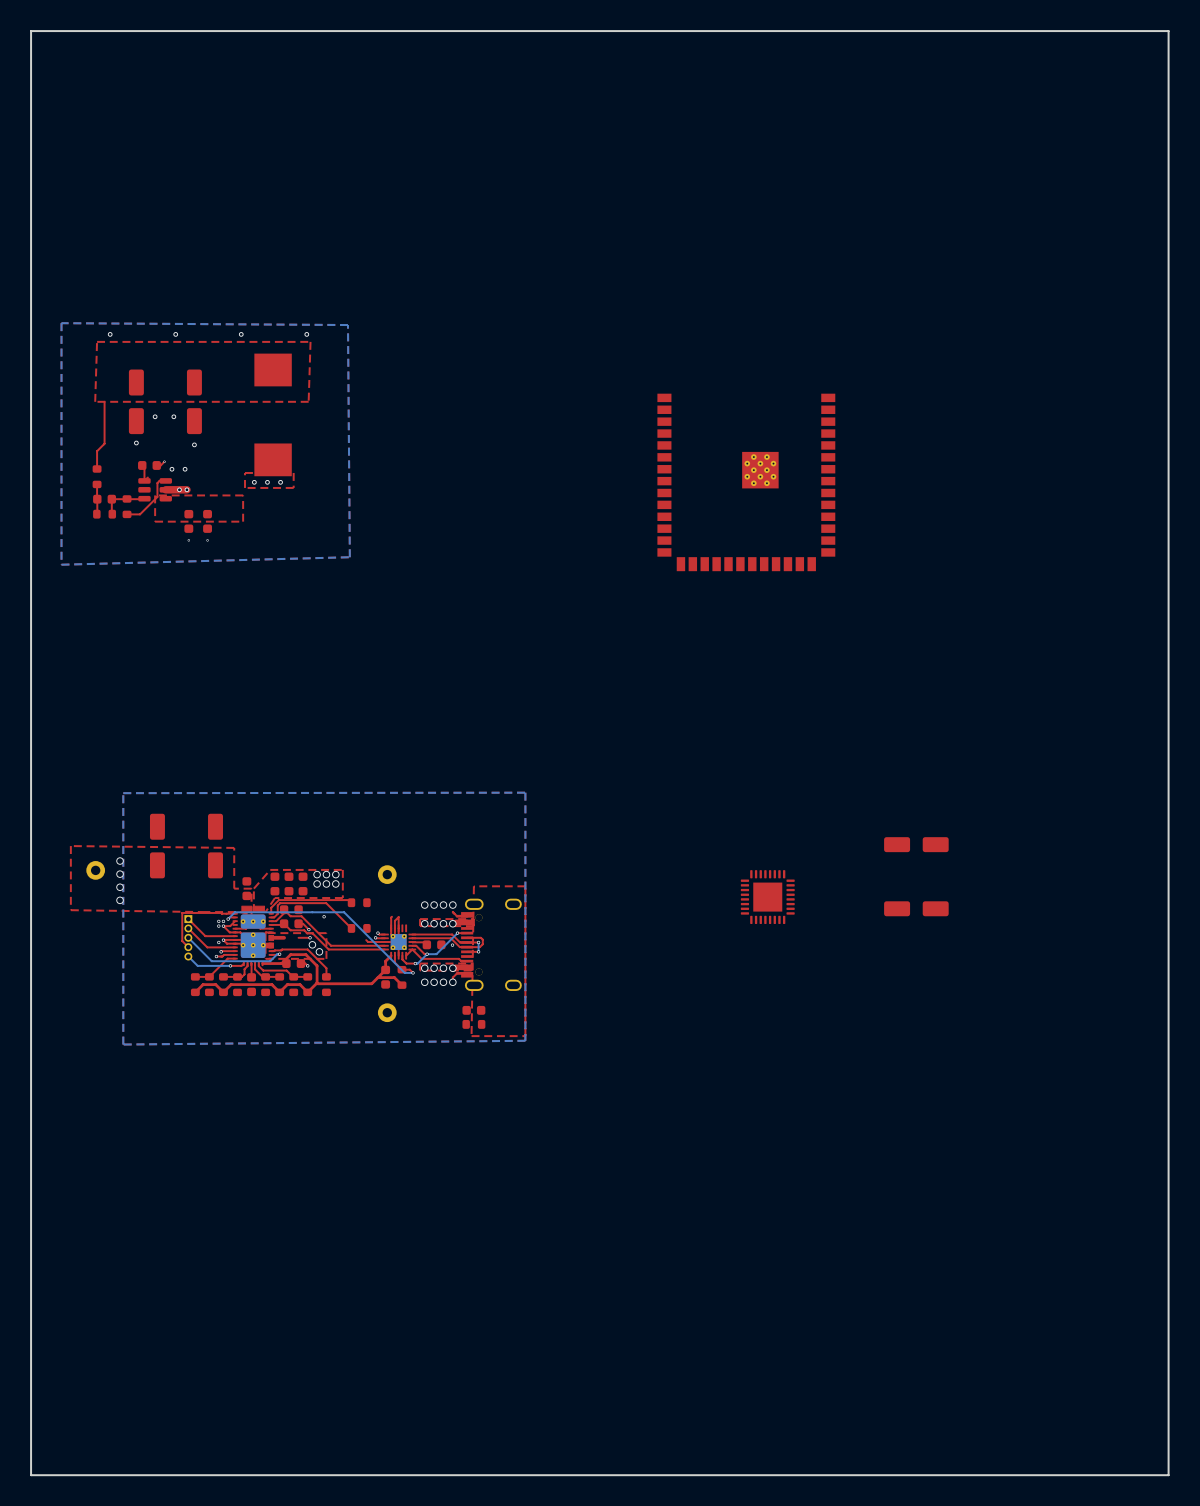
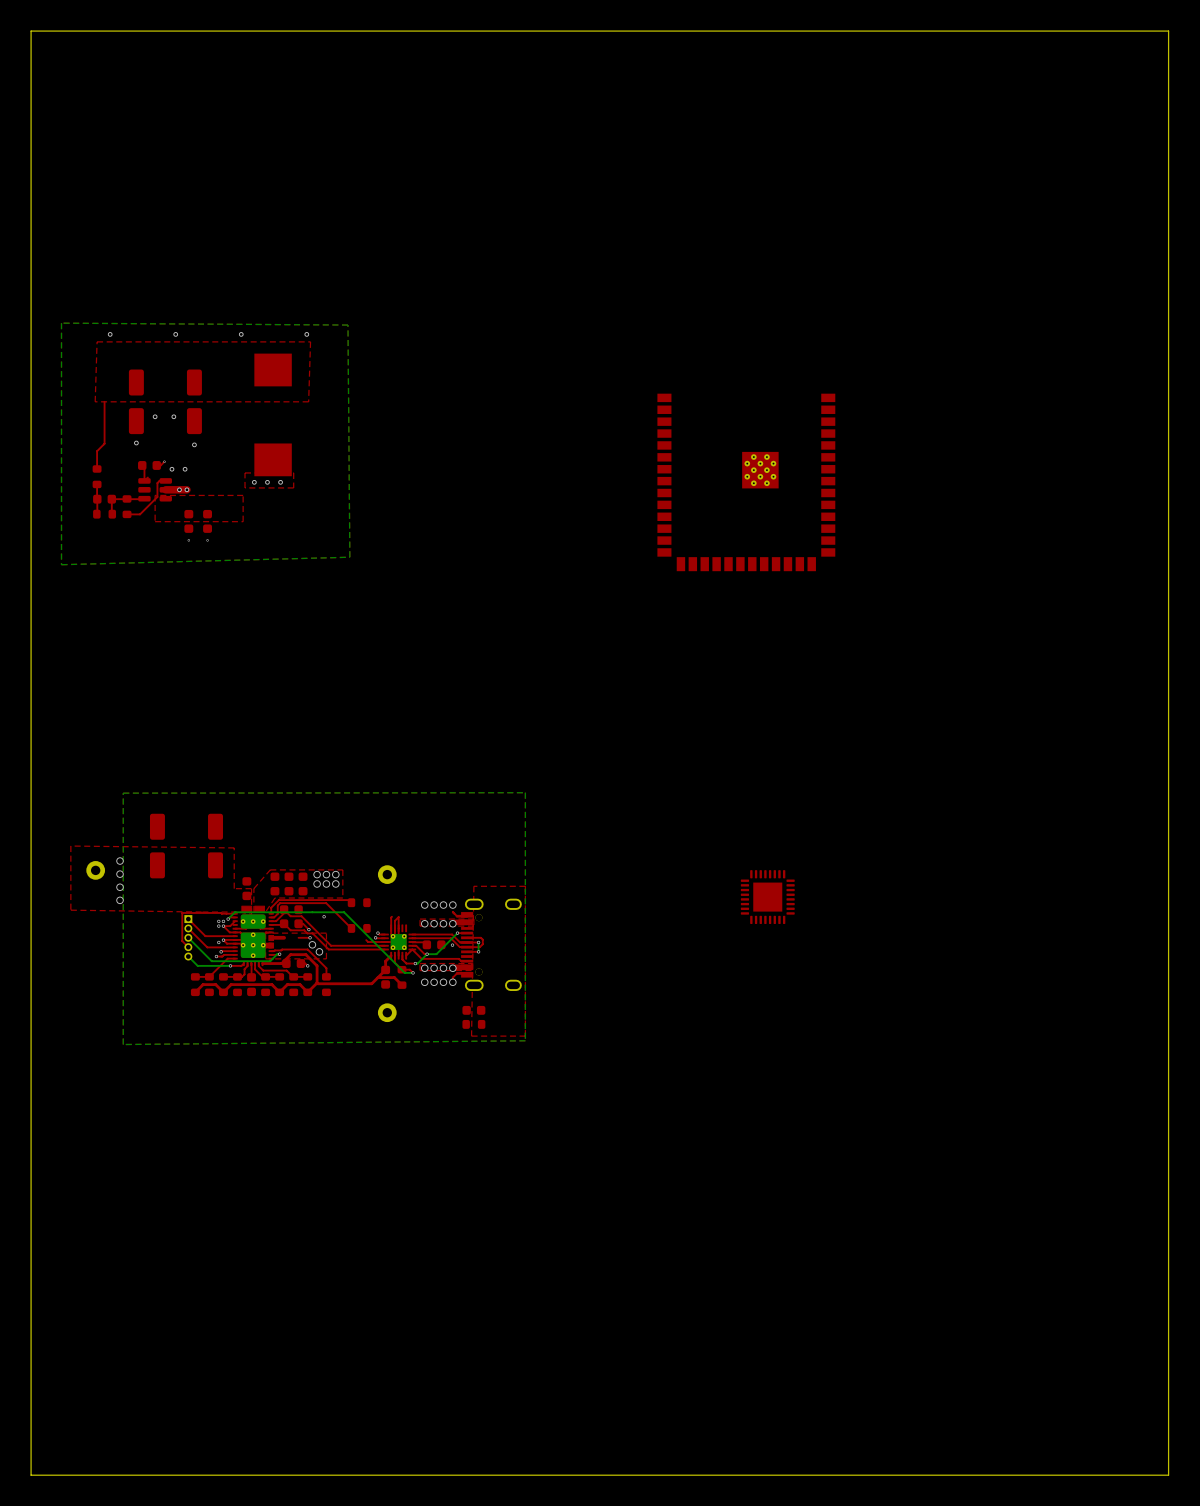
part: (916, 844) -> none
part: (916, 908) -> none

